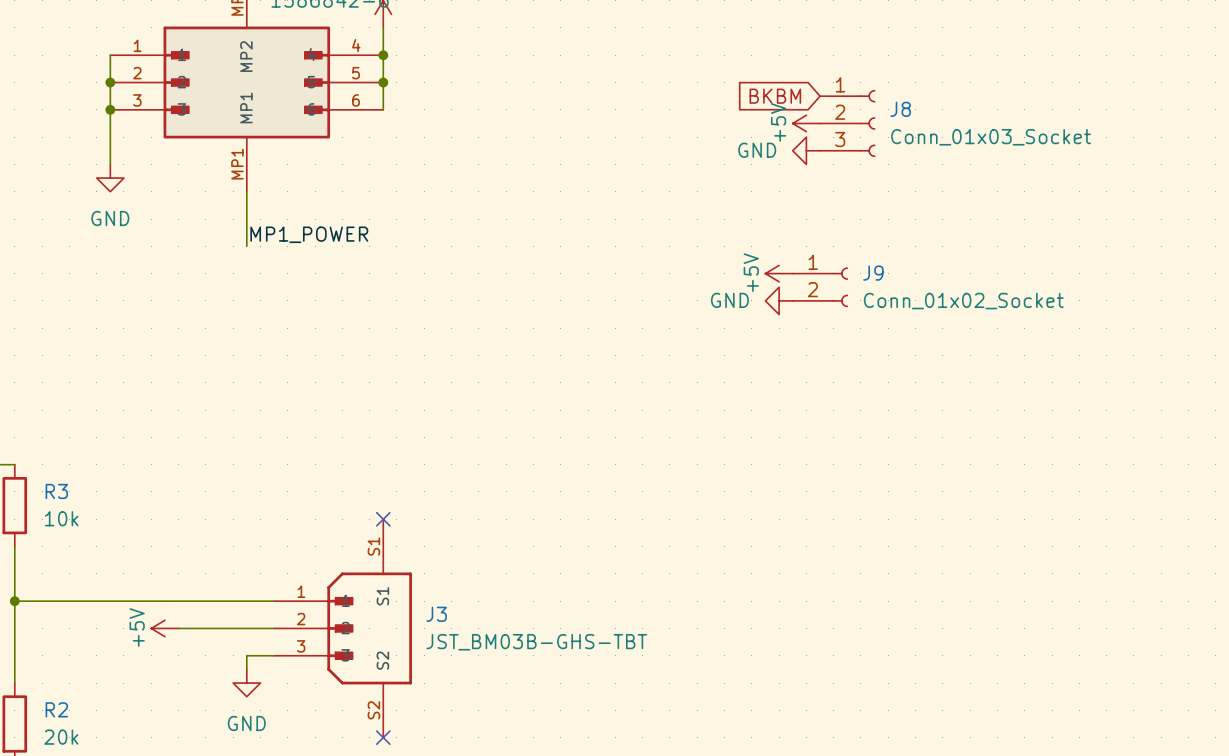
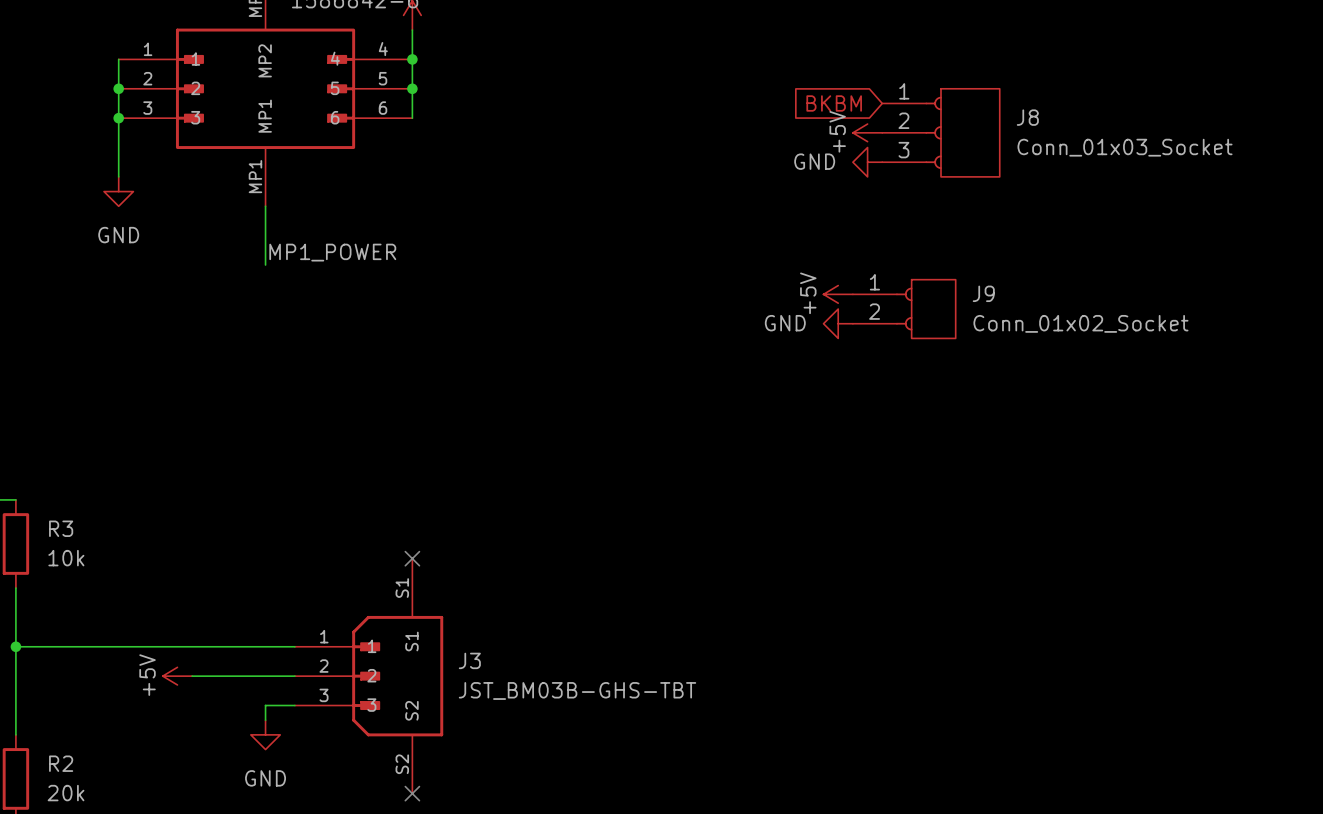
J8 symbol: [820, 89, 876, 158] -> [882, 88, 1000, 177]
J8 name position: J8 (900, 109) -> J8 (1027, 117)
J8 value position: Conn_01x03_Socket (991, 137) -> Conn_01x03_Socket (1125, 147)
J9 symbol: [792, 267, 849, 308] -> [852, 279, 956, 339]

